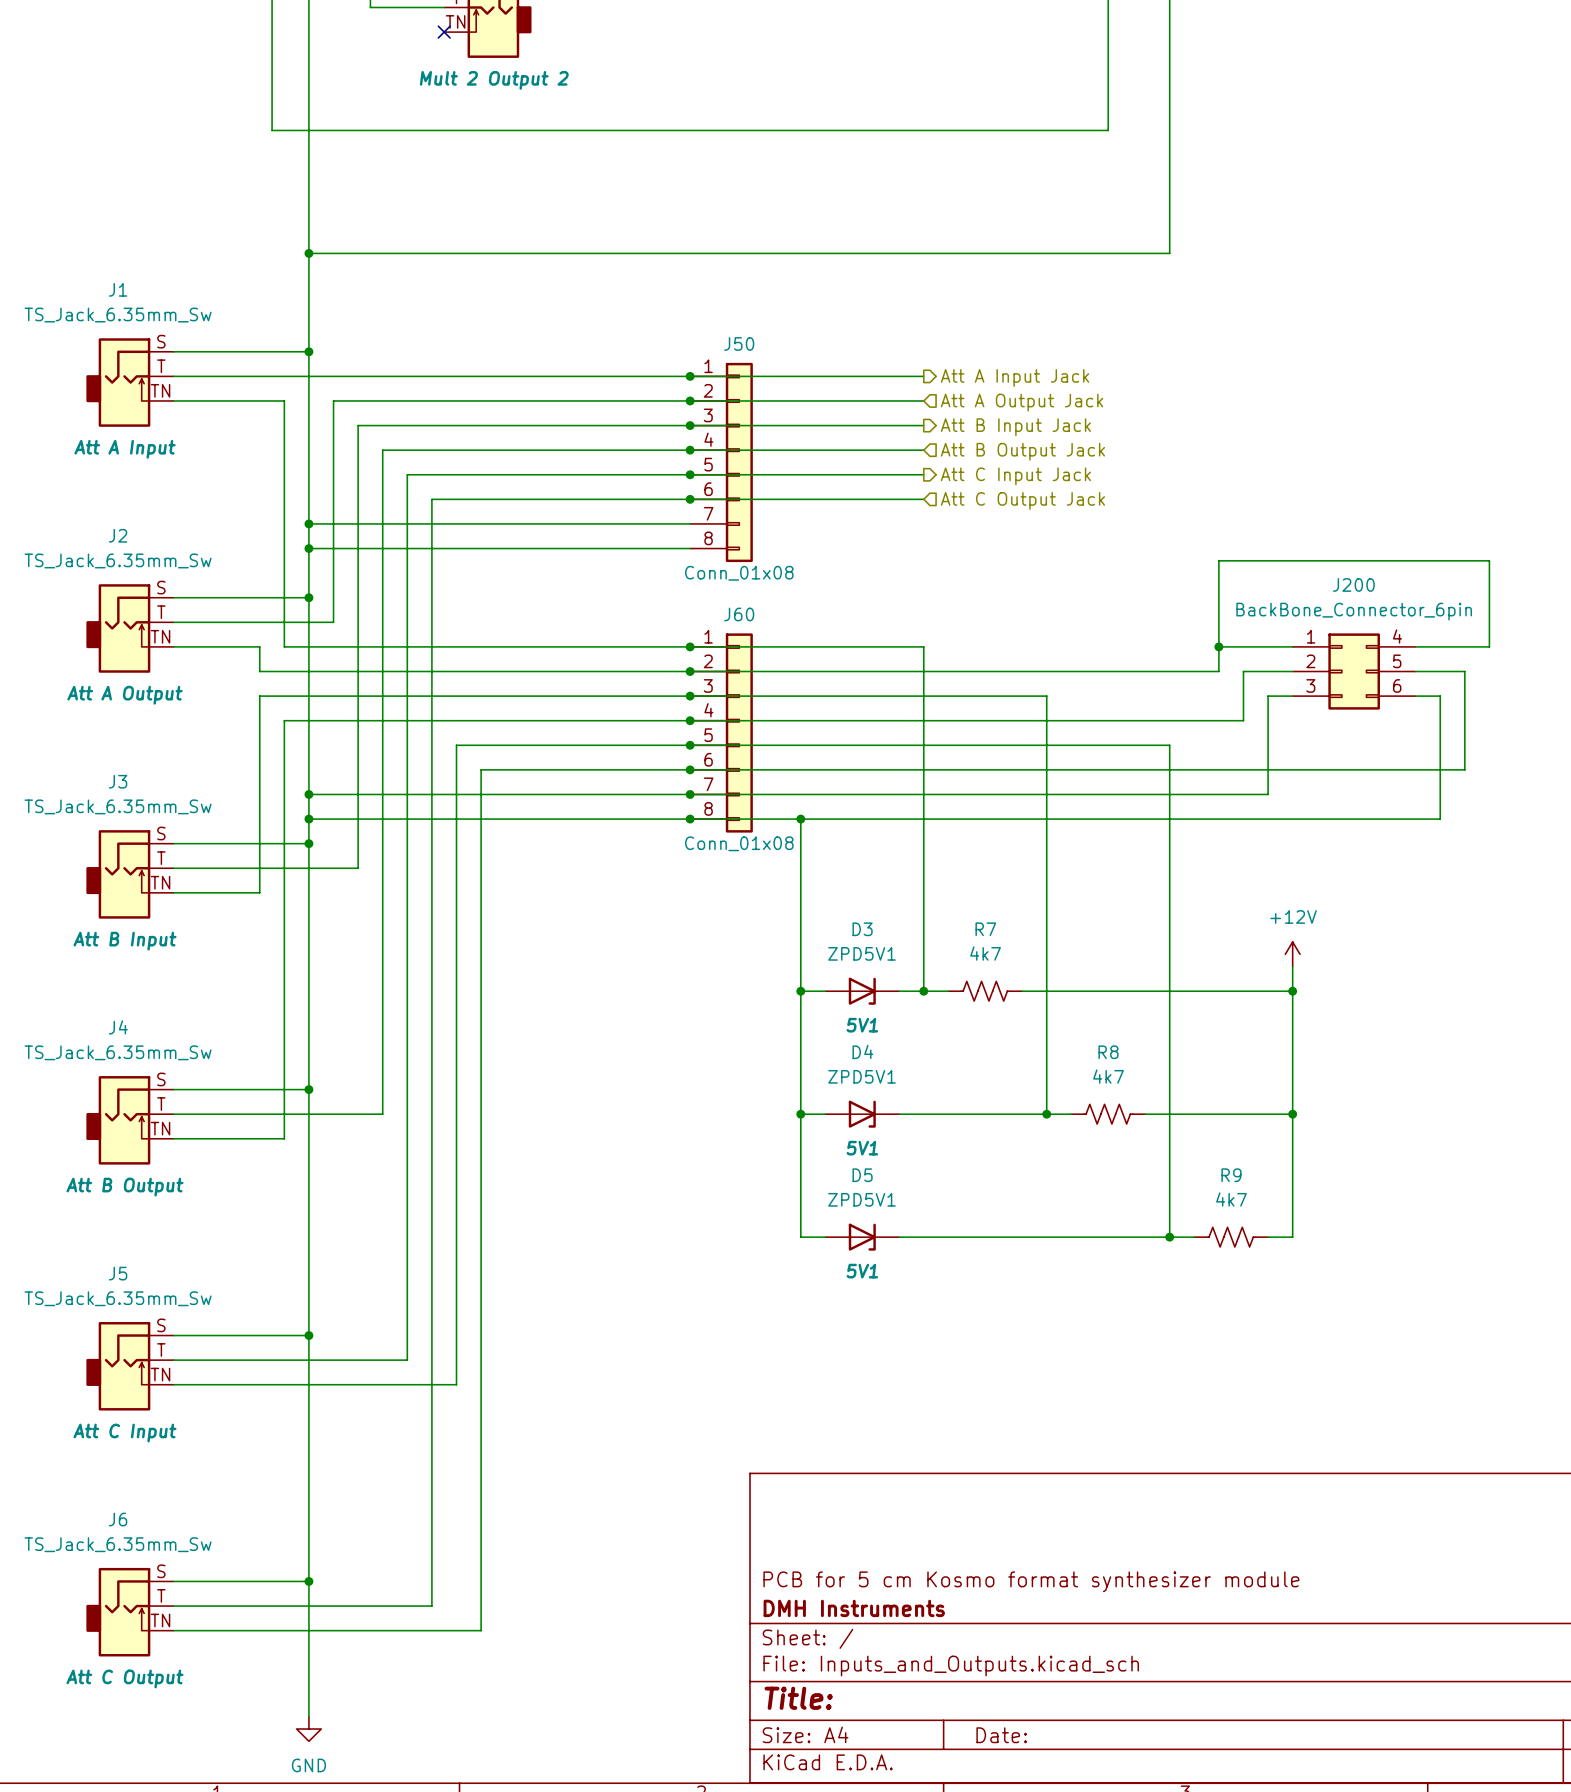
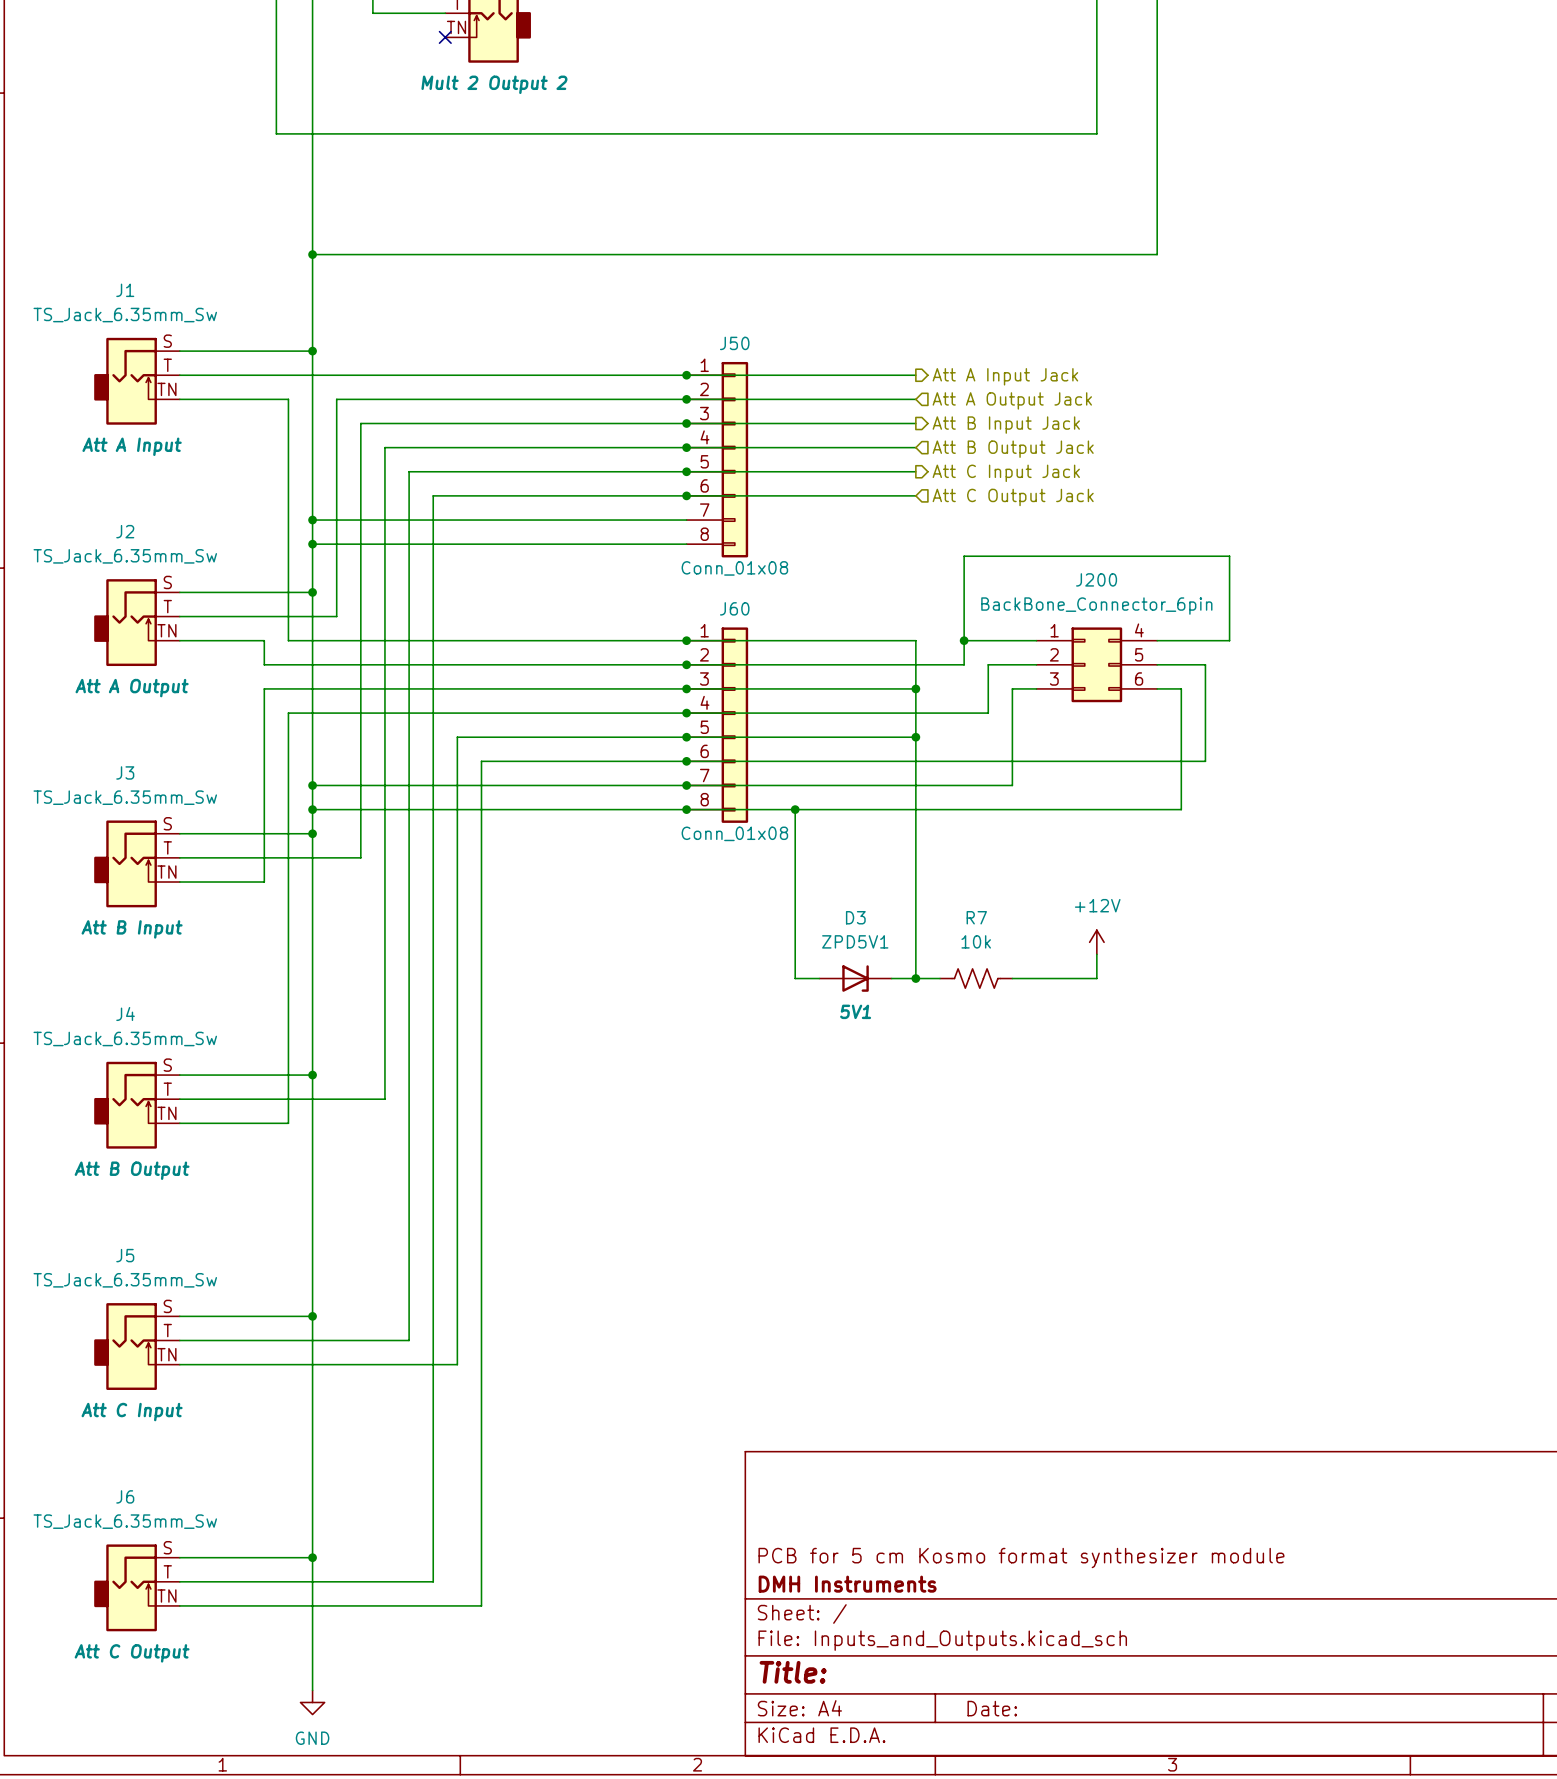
wire: (1218, 560) (1218, 671) -> (1205, 556) (964, 556) (964, 664)
wire: (1243, 560) (1489, 560) (1489, 646) (1415, 646) -> none
wire: none -> (964, 640) (1036, 640)
junction: none -> (964, 640)
wire: none -> (1157, 640) (1205, 640)
junction: (1218, 646) -> none
wire: (1243, 646) (1292, 646) -> (1229, 640) (1229, 556)
wire: (972, 671) (997, 671) -> (988, 713) (988, 664)
wire: (1292, 671) (1243, 671) (1243, 720) (997, 720) -> none
J200 position: (1354, 671) -> (1096, 664)
wire: (1415, 671) (1464, 671) (1464, 769) (1218, 769) -> (1205, 664) (1205, 761)
wire: (923, 696) (1022, 696) -> (1012, 785) (1012, 688)
junction: none -> (915, 688)
wire: (1046, 696) (1046, 1114) -> none
wire: (1292, 696) (1268, 696) (1268, 794) (1022, 794) -> none
wire: (1415, 696) (1440, 696) (1440, 819) (1194, 819) -> (1157, 688) (1181, 688) (1181, 809)
wire: (923, 745) (1169, 745) (1169, 1237) -> none
junction: none -> (915, 737)
R7 value: 4k7 (985, 953) -> 10k (976, 941)
power symbol position: +12V (1292, 954) -> +12V (1096, 942)
wire: (1292, 966) (1292, 1237) (1268, 1237) -> none
wire: (800, 991) (800, 1237) (825, 1237) -> none
junction: (800, 991) -> none
wire: (1108, 991) (1292, 991) -> (1096, 978) (1096, 954)
junction: (1292, 991) -> none
wire: (800, 1114) (825, 1114) -> none
junction: (800, 1114) -> none
D4: ZPD5V1 (862, 1114) -> none
wire: (899, 1114) (1071, 1114) -> none
junction: (1046, 1114) -> none
R8: 4k7 (1108, 1114) -> none
wire: (1145, 1114) (1292, 1114) -> none
junction: (1292, 1114) -> none
D5: ZPD5V1 (862, 1237) -> none
wire: (899, 1237) (1194, 1237) -> none
junction: (1169, 1237) -> none
R9: 4k7 (1231, 1237) -> none

